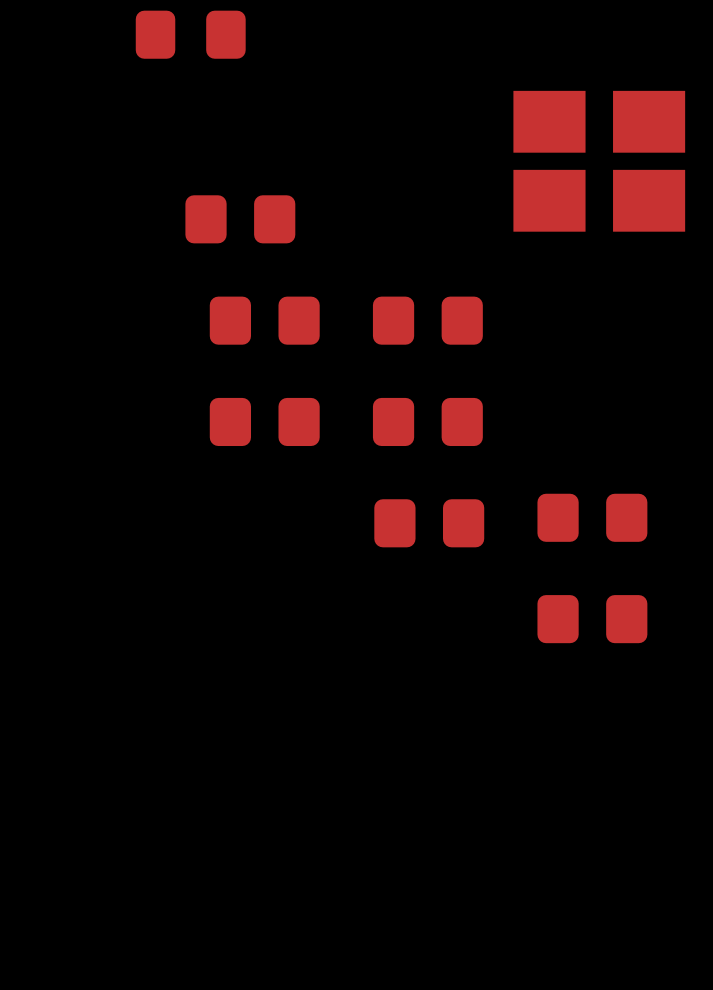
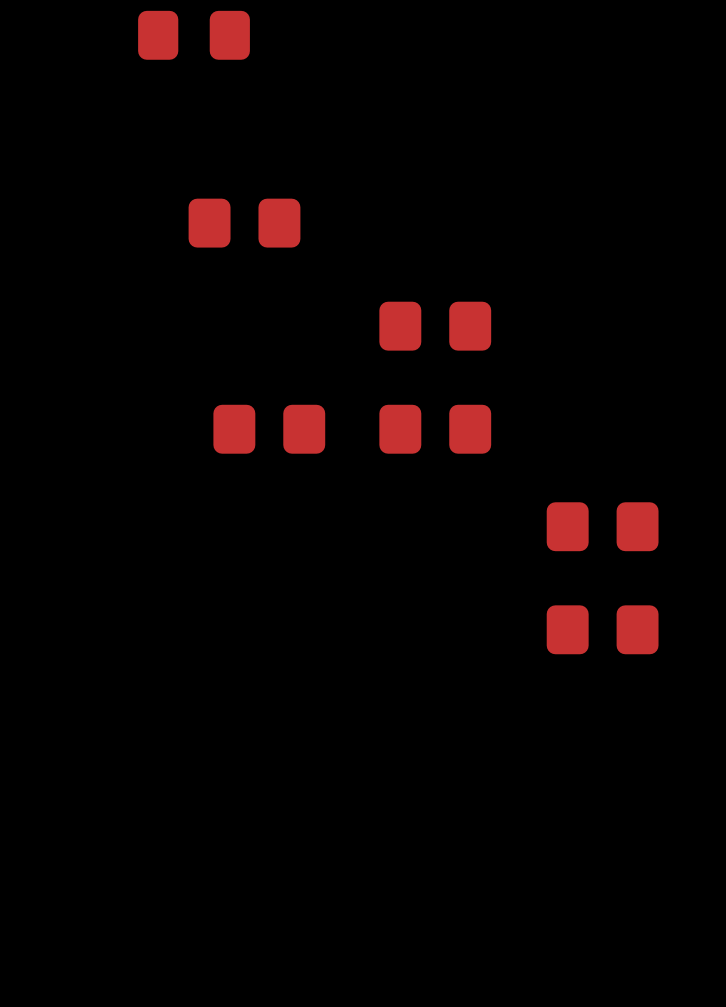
part: (599, 161) -> none
part: (264, 320) -> none
part: (429, 523) -> none

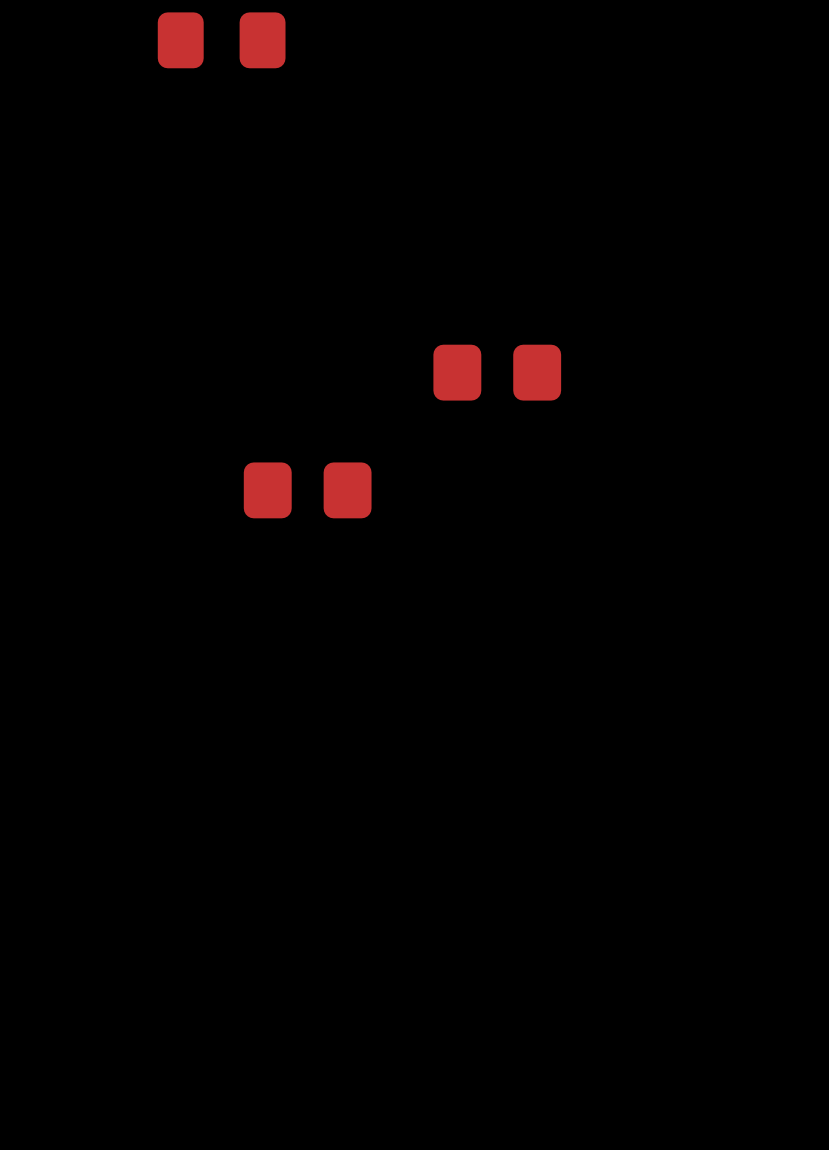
part: (244, 223) -> none
part: (435, 429) -> none
part: (602, 526) -> none
part: (602, 629) -> none

